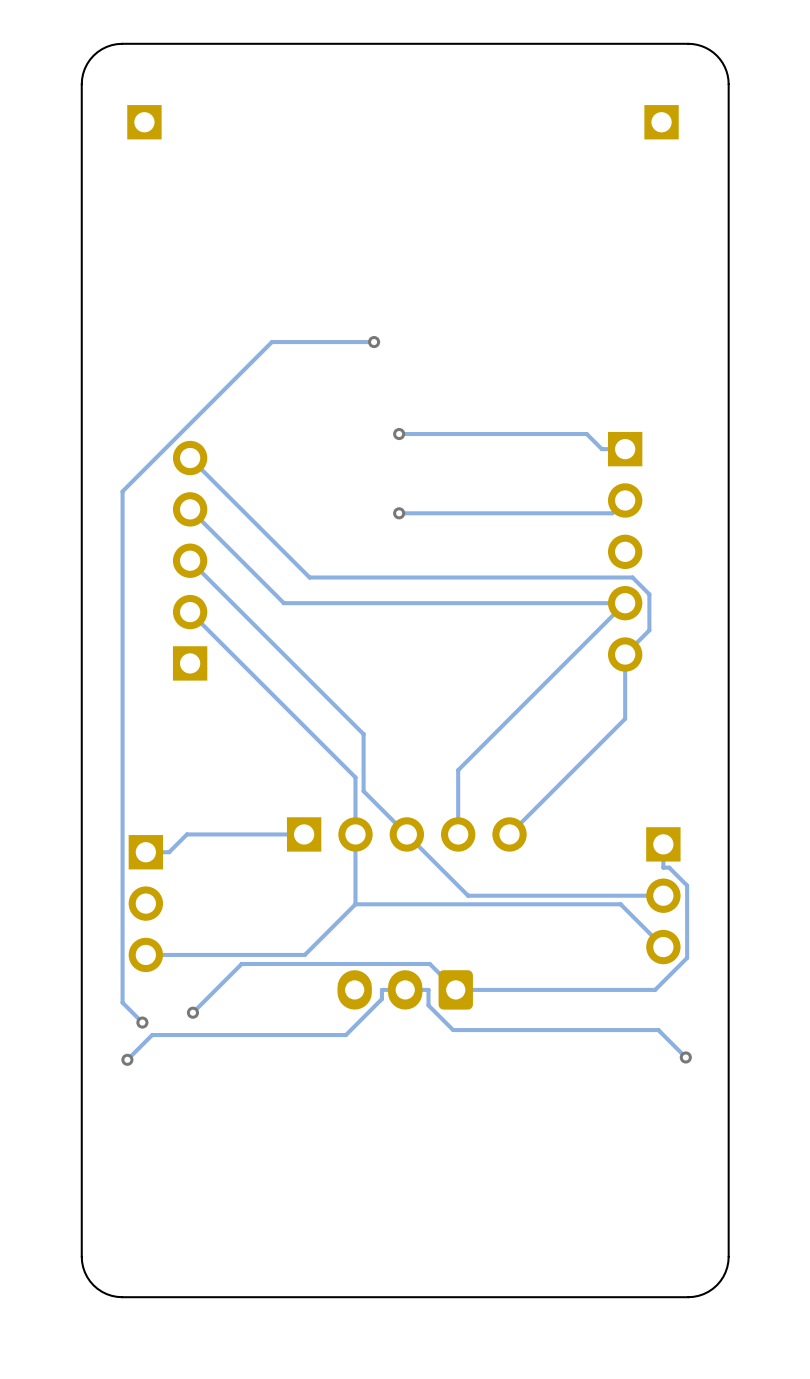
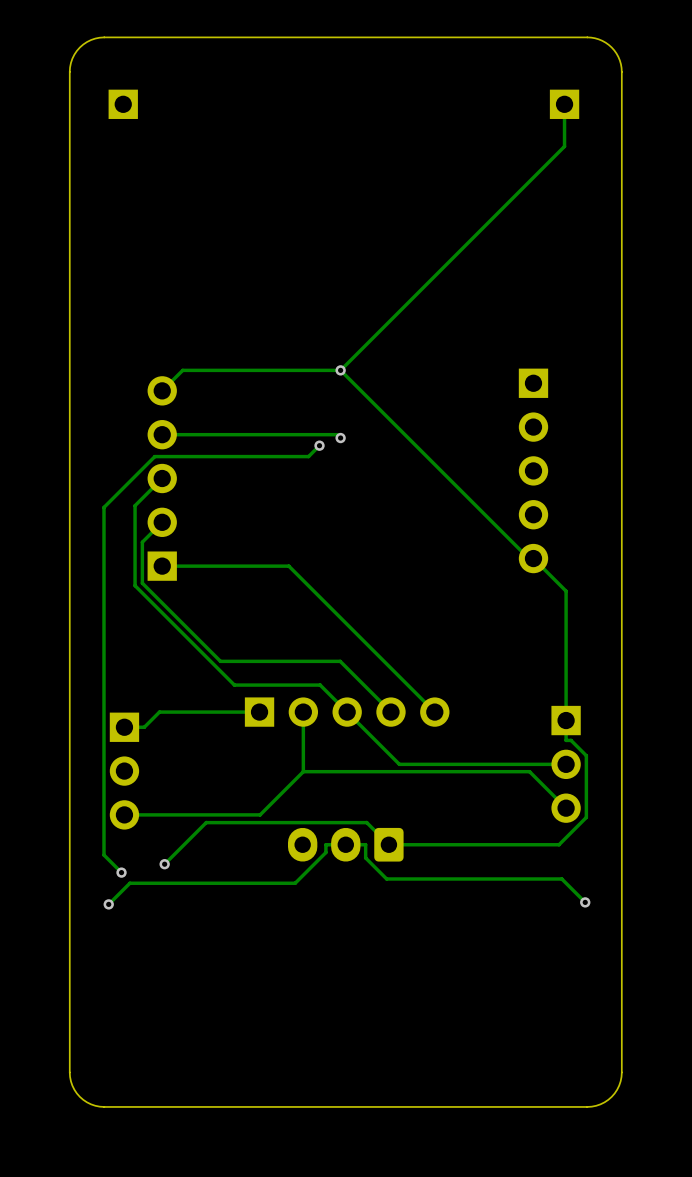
track: (374, 342) (271, 342) (122, 491) (122, 1002) -> (319, 445) (308, 456) (154, 456) (103, 507) (104, 855)
via: (374, 342) -> none
track: (399, 434) (586, 434) (601, 449) (625, 449) -> (340, 370) (564, 146) (564, 104)
track: none -> (340, 370) (528, 558) (533, 558) (566, 591) (566, 720)
track: none -> (340, 370) (182, 370) (162, 390)
track: (190, 458) (309, 577) (632, 577) (649, 594) (649, 630) (625, 654) (625, 718) (509, 834) -> (162, 566) (288, 566) (434, 712)
track: (625, 500) (612, 513) (399, 513) -> (162, 434) (337, 434) (340, 438)
track: (190, 509) (283, 603) (625, 603) (458, 770) (458, 834) -> (162, 522) (142, 542) (142, 583) (220, 661) (340, 661) (390, 712)
via: none -> (319, 445)
track: (190, 560) (363, 734) (363, 791) (375, 802) -> (162, 478) (135, 505) (135, 585) (234, 685) (320, 685)
track: (190, 612) (355, 777) (355, 834) -> none

